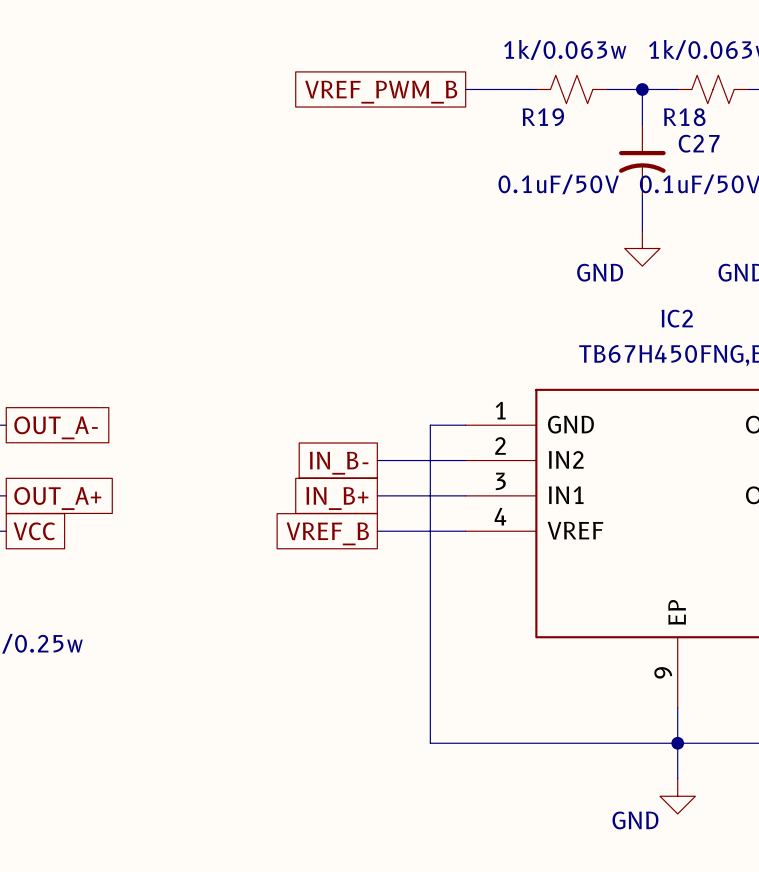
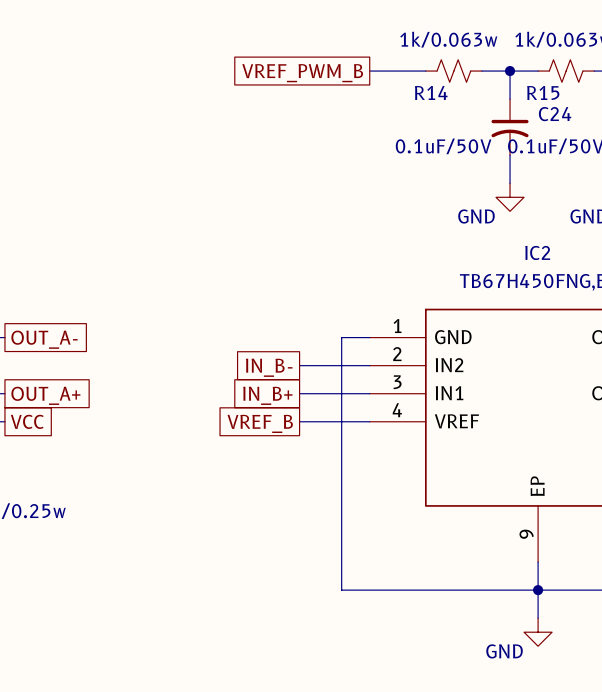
R19 name: R19 (543, 117) -> R14 (431, 92)
R18 name: R18 (684, 117) -> R15 (543, 92)
C27 name: C27 (699, 143) -> C24 (555, 114)

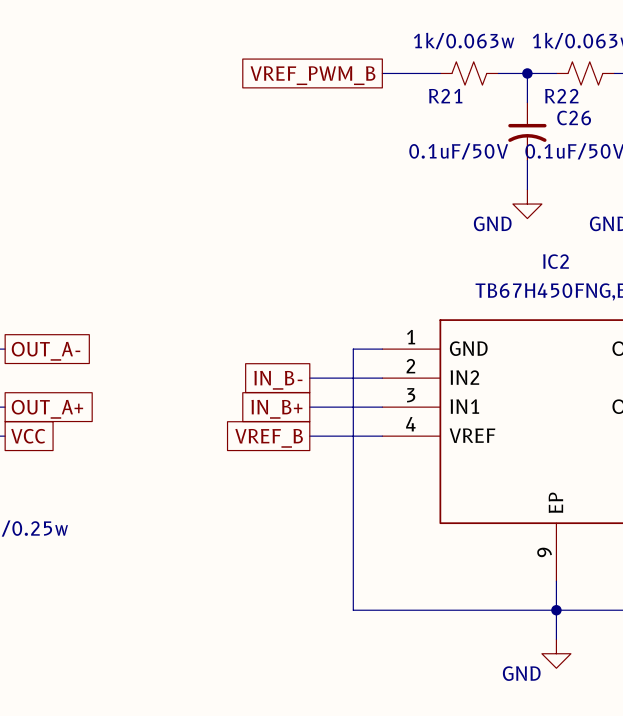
R14 name: R14 (431, 92) -> R21 (445, 96)
R15 name: R15 (543, 92) -> R22 (561, 96)
C24 name: C24 (555, 114) -> C26 (574, 117)

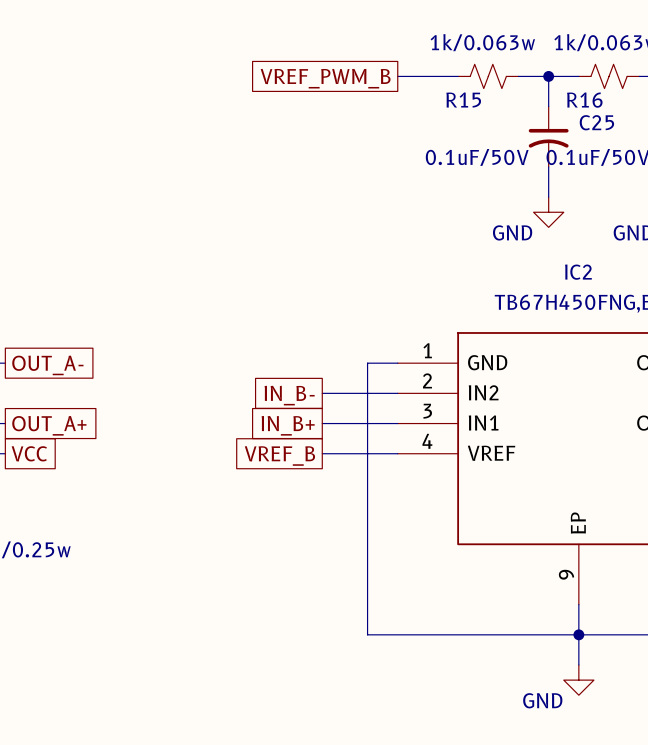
R21 name: R21 (445, 96) -> R15 (463, 100)
R22 name: R22 (561, 96) -> R16 (584, 100)
C26 name: C26 (574, 117) -> C25 (596, 122)

